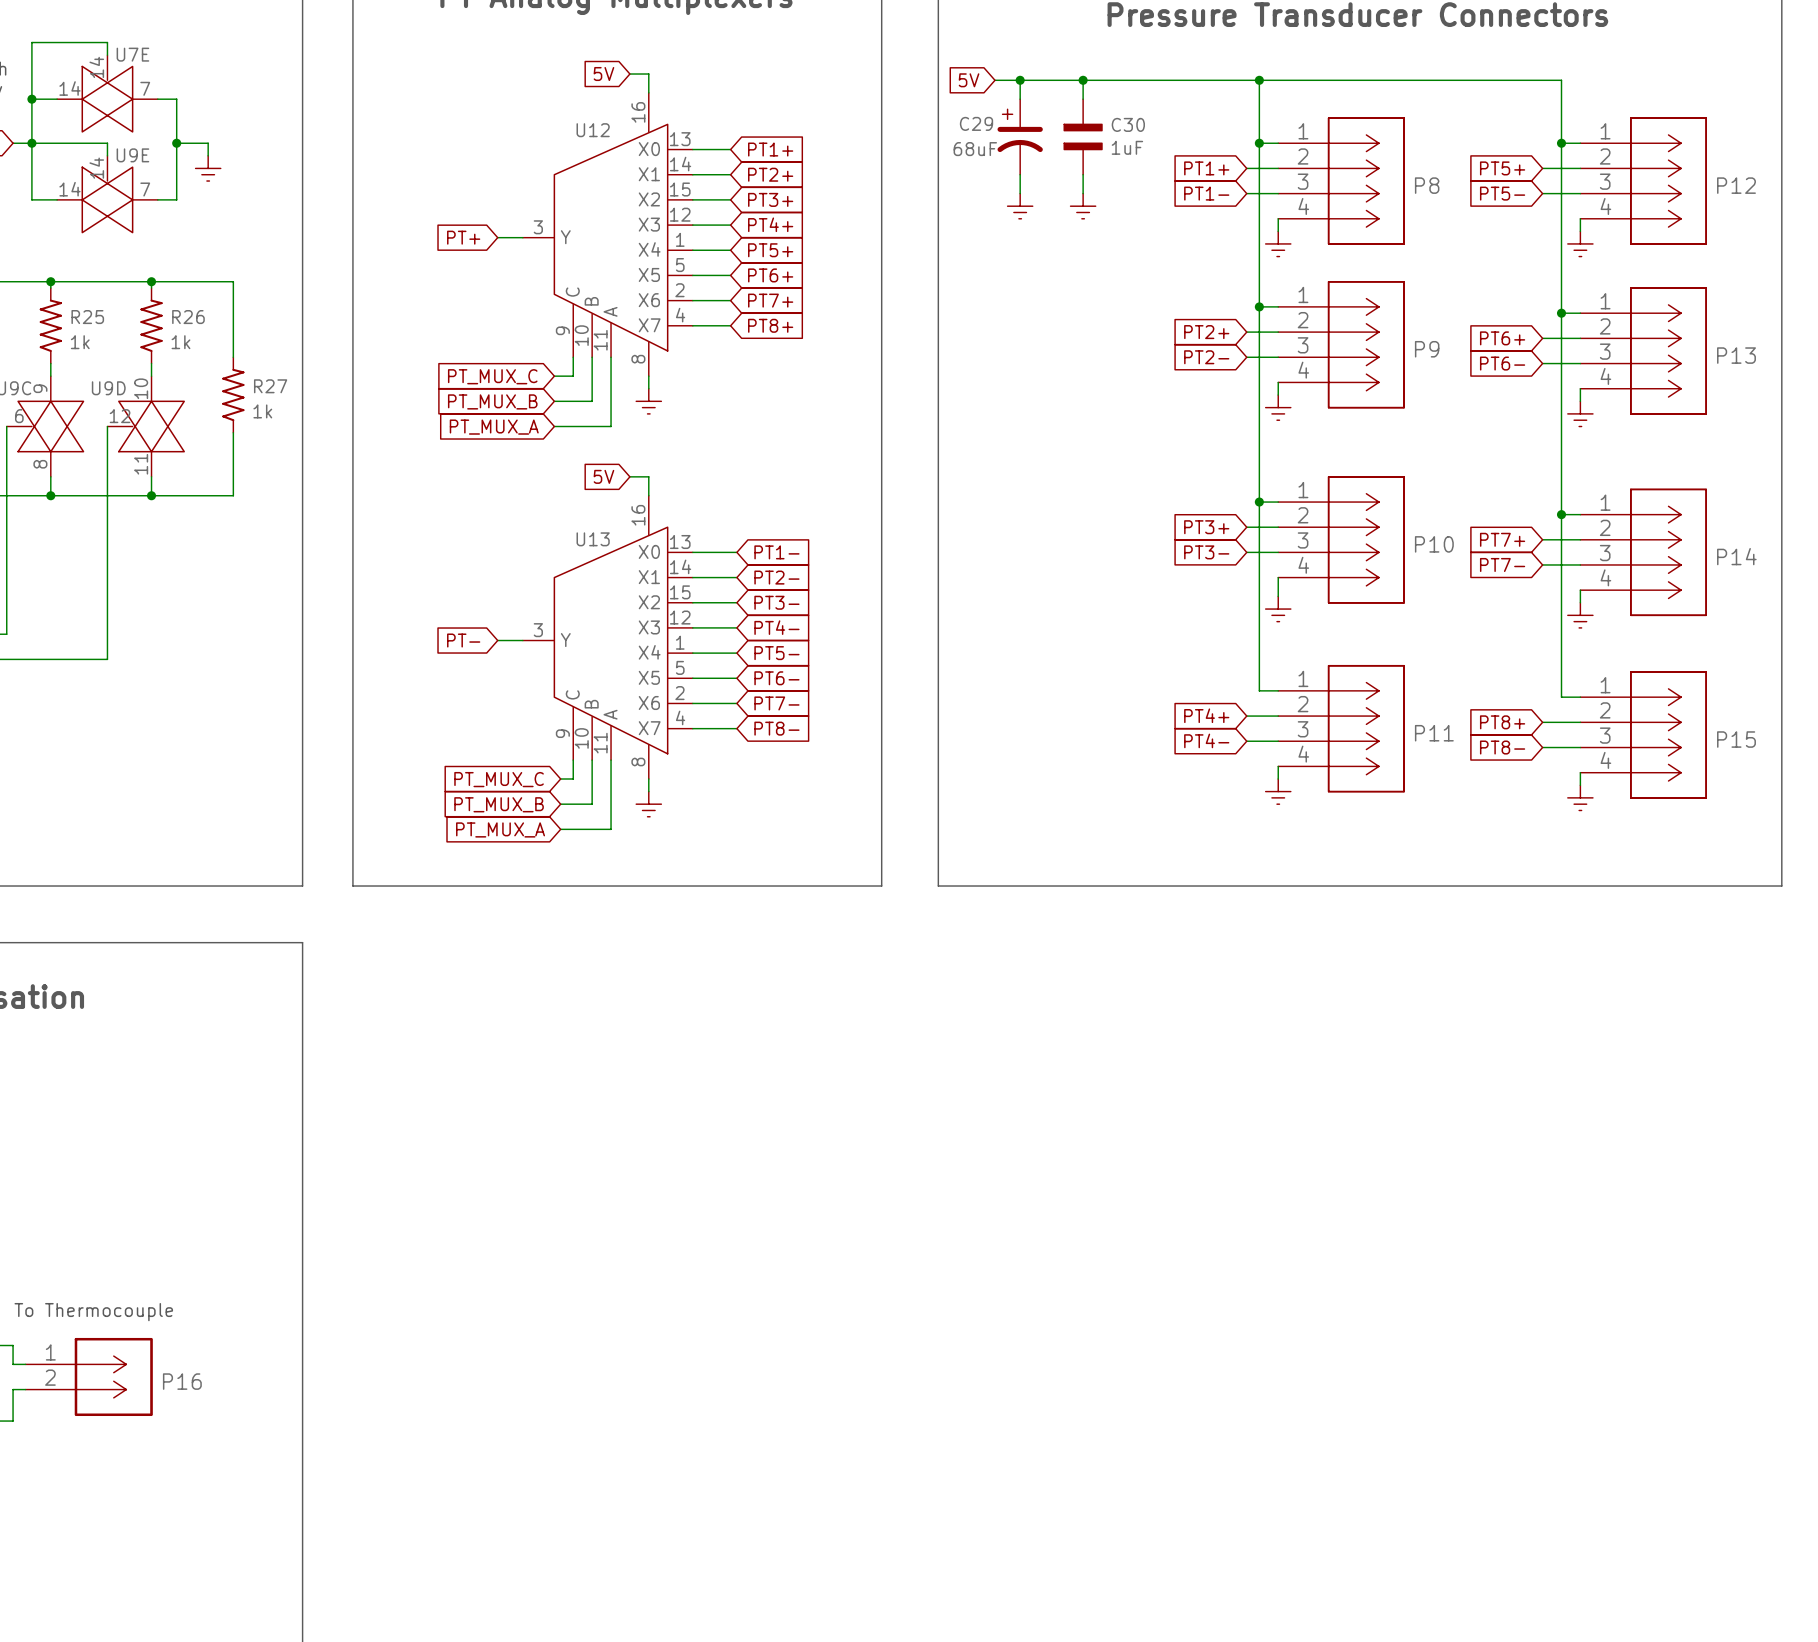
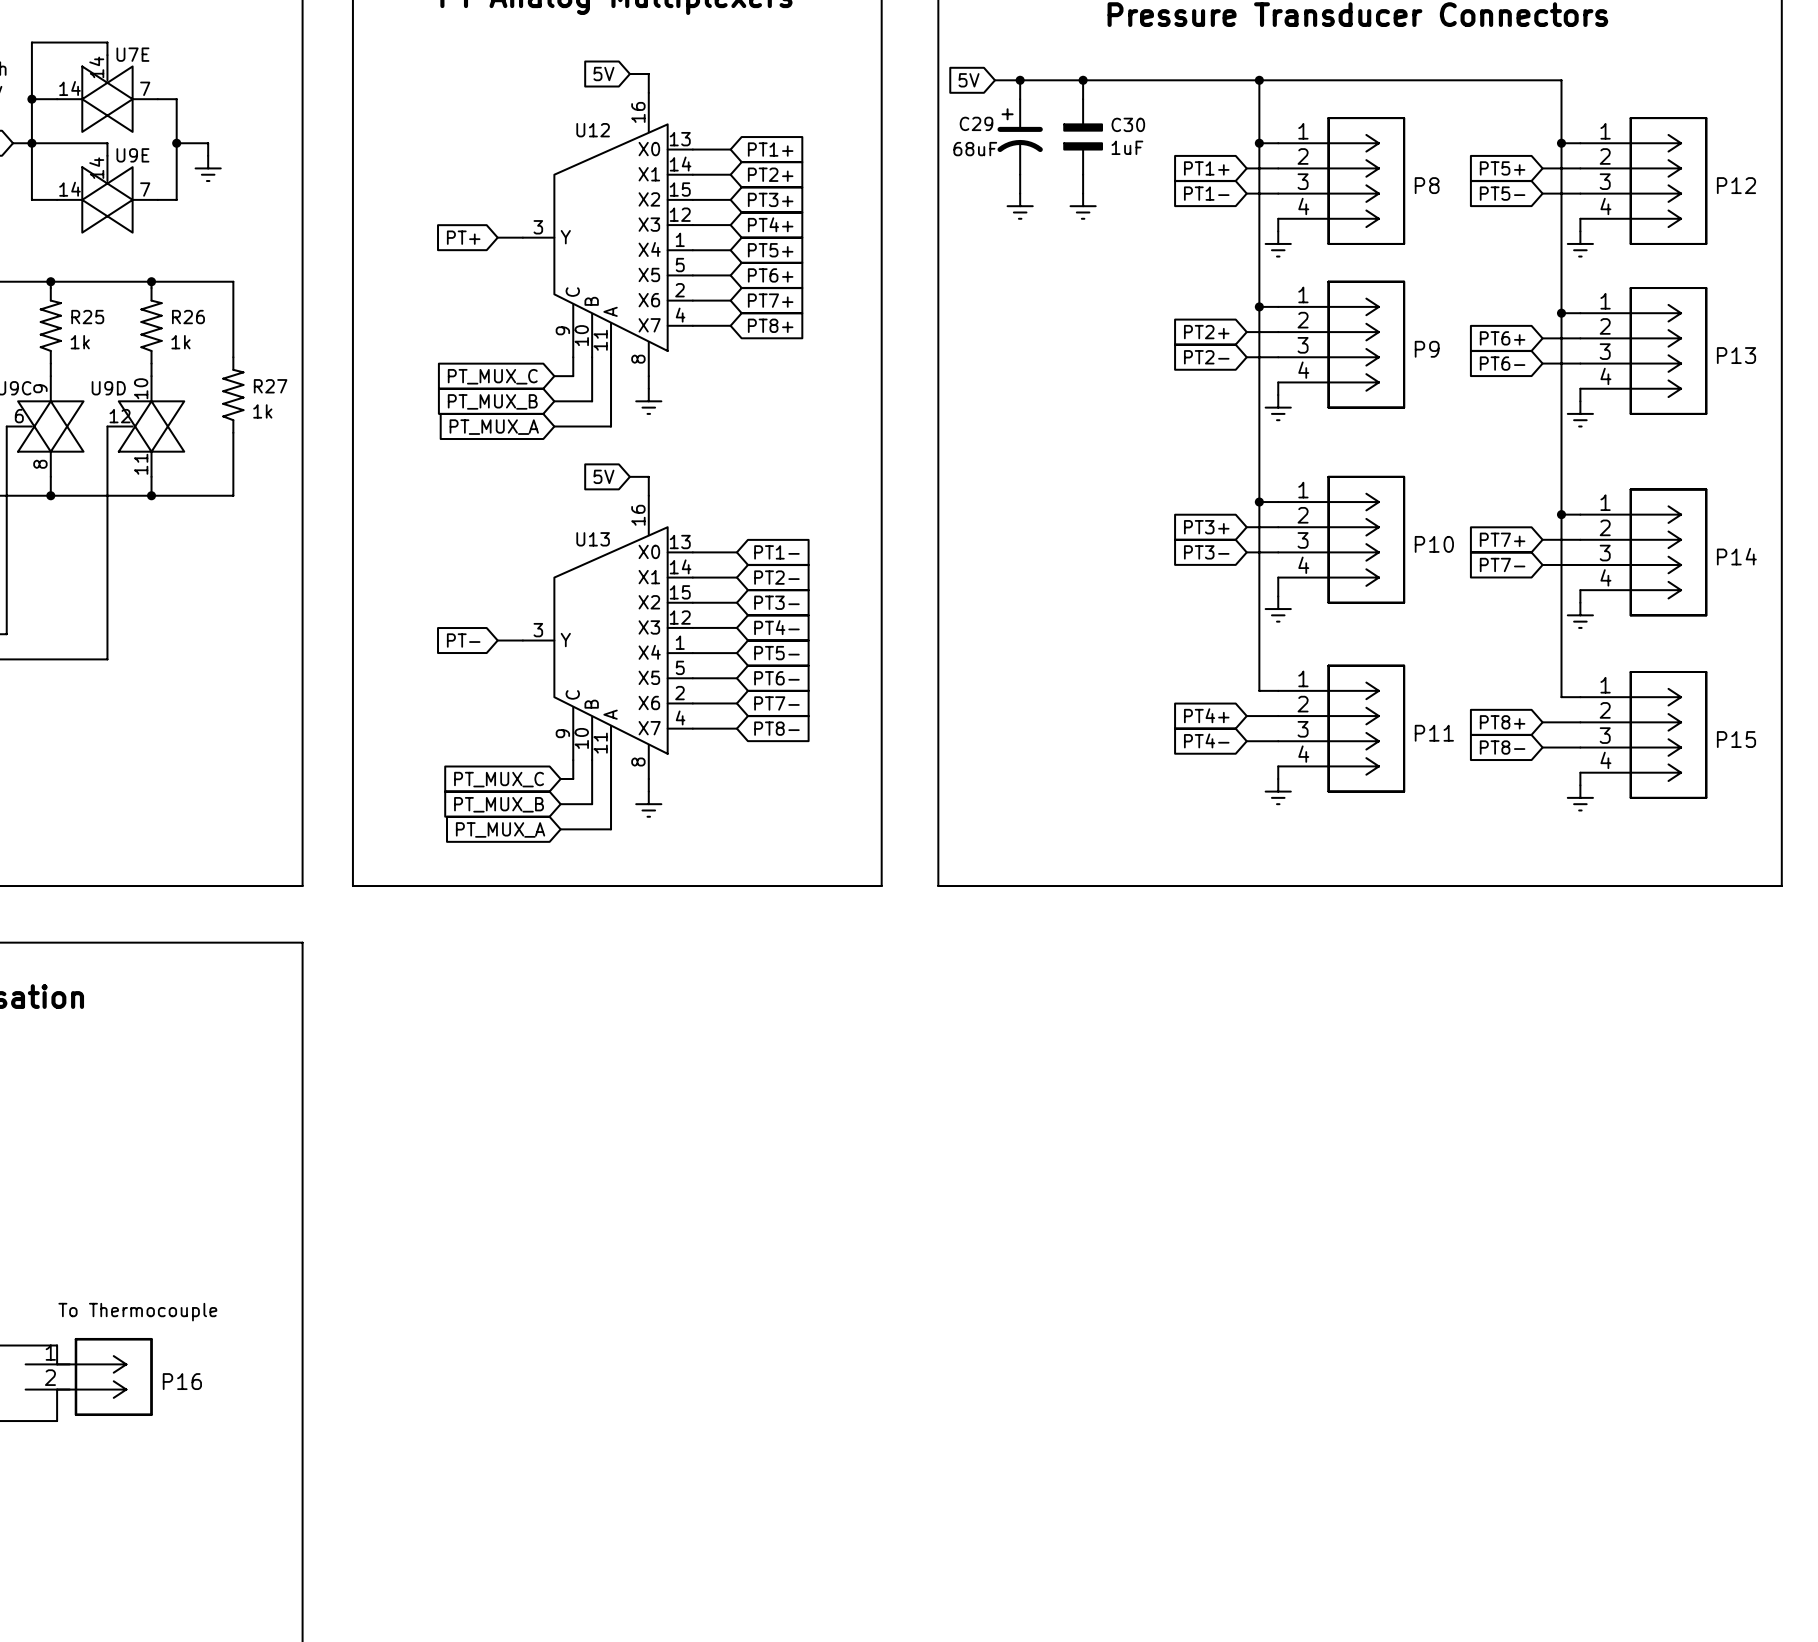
text position: To Thermocouple (93, 1312) -> To Thermocouple (137, 1312)
wire: (13, 1345) (13, 1364) (25, 1364) -> (13, 1345) (57, 1345) (57, 1364) (69, 1364)
wire: (25, 1389) (13, 1389) (13, 1421) -> (69, 1389) (57, 1389) (57, 1421) (13, 1421)

